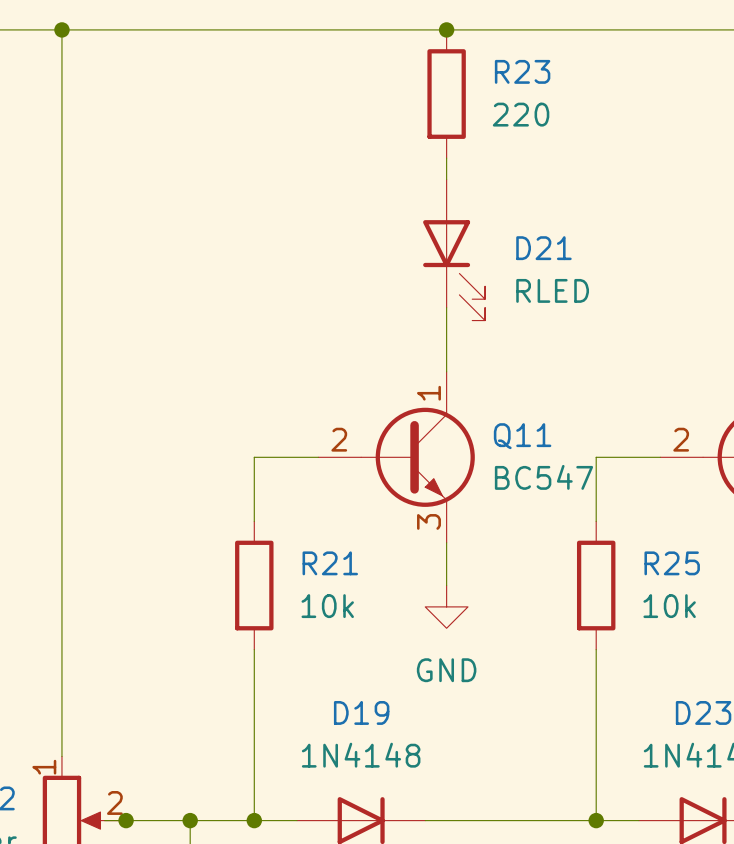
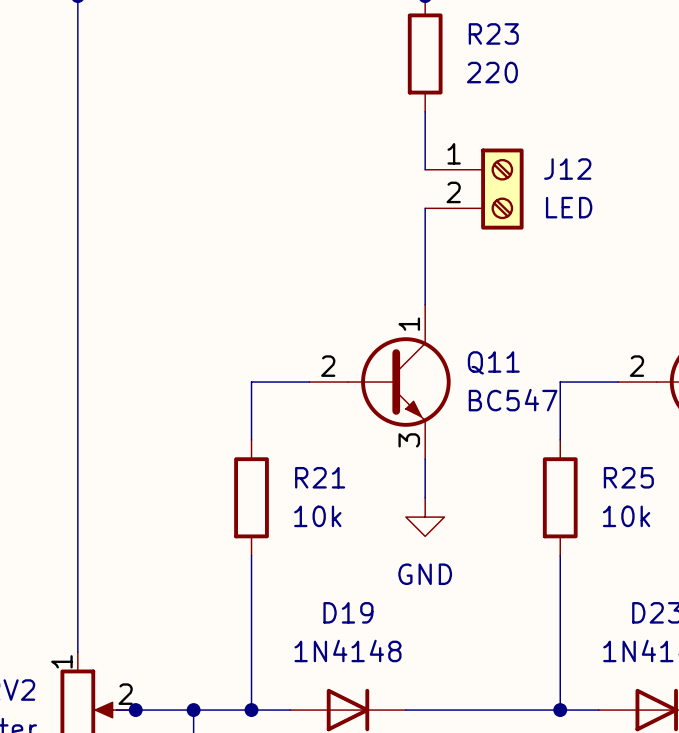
J12: none -> LED (474, 189)
D21: RLED (454, 250) -> none

